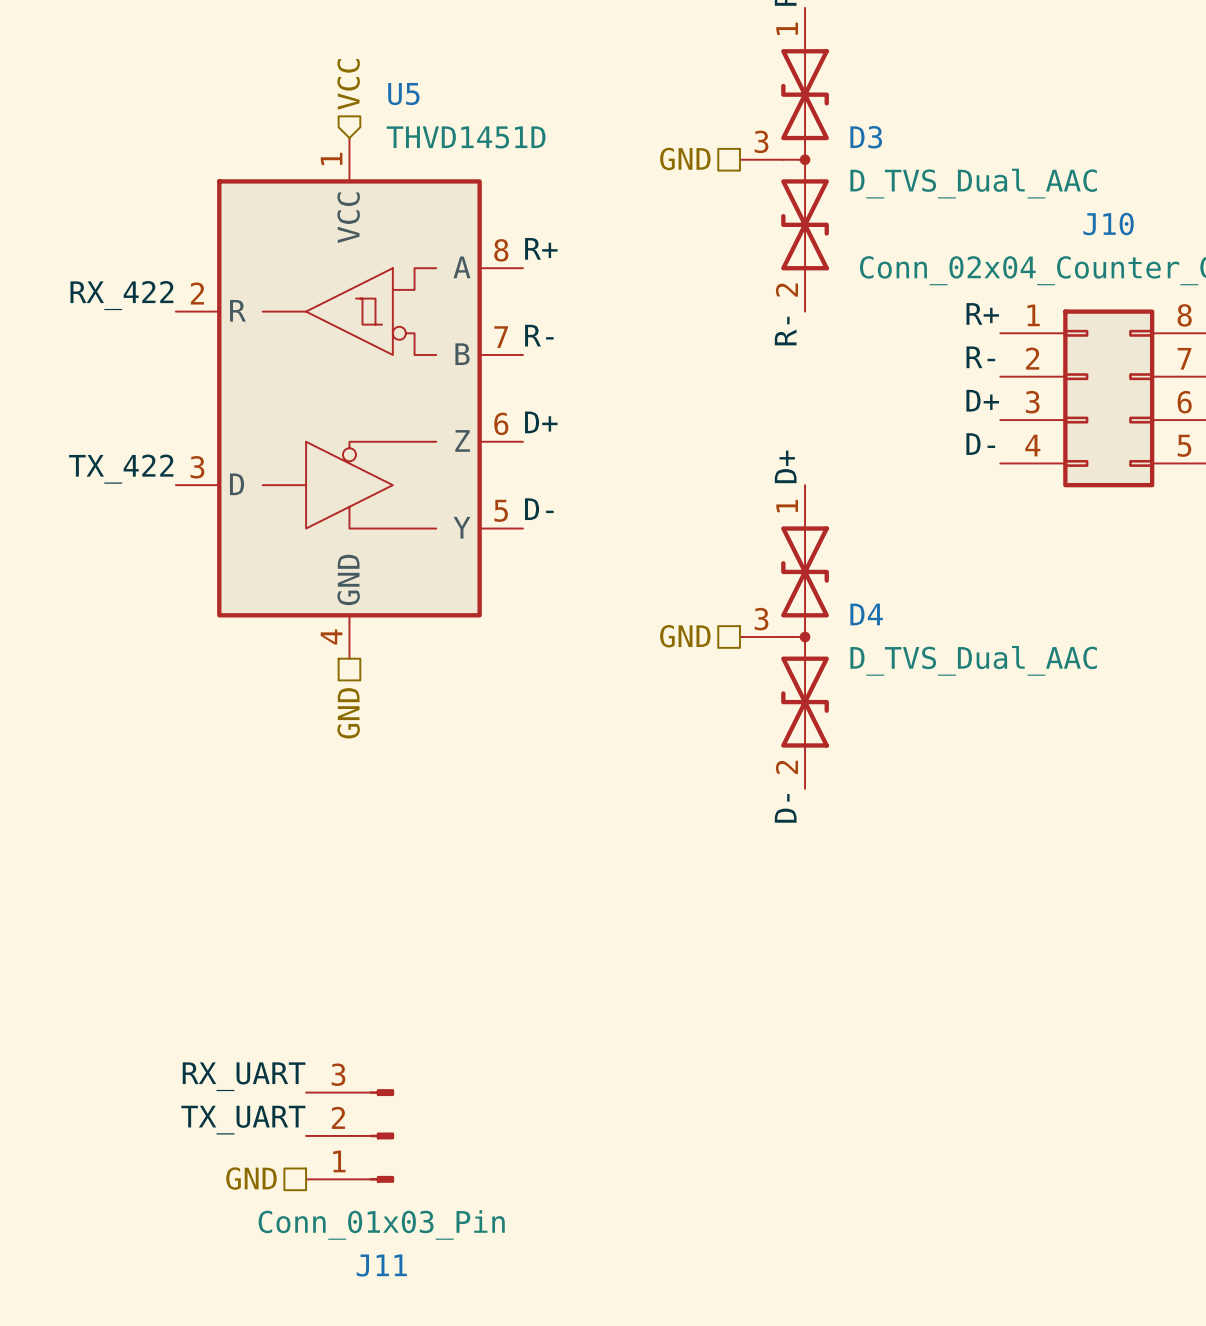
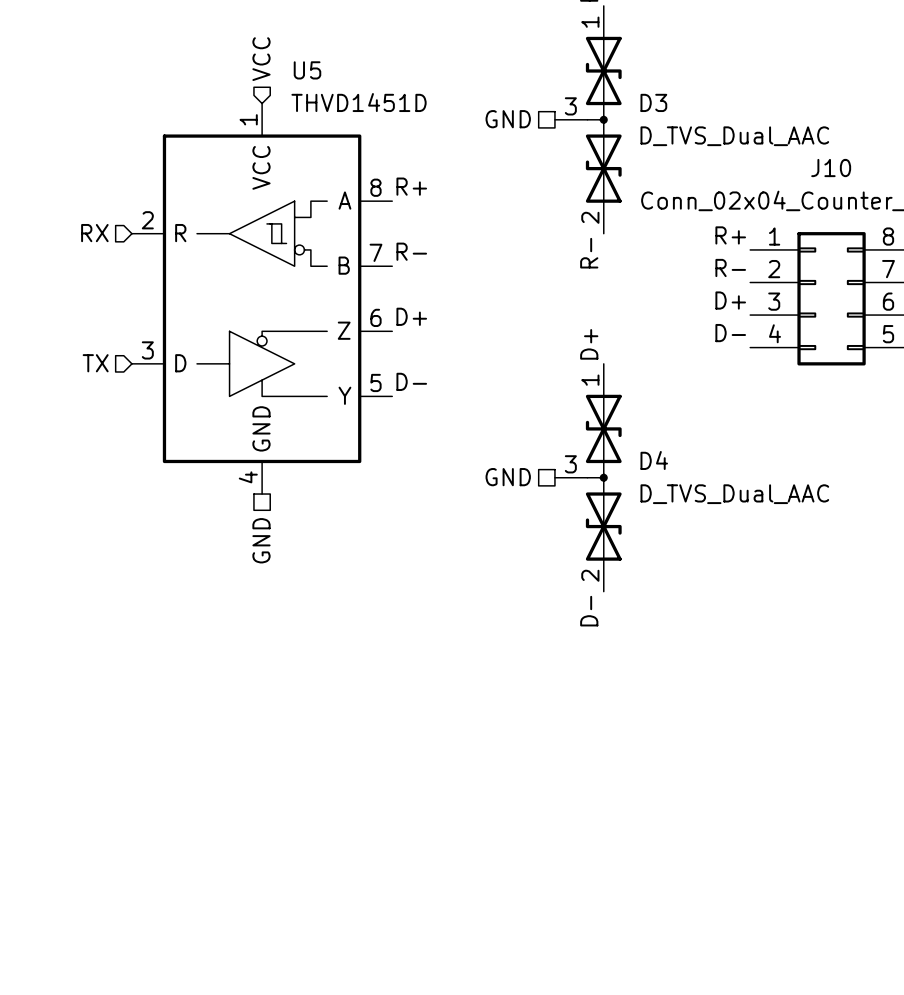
label: RX_422 (121, 295) -> none
hierarchical label: none -> RX (94, 233)
label: TX_422 (121, 469) -> none
hierarchical label: none -> TX (95, 363)
label: RX_UART (244, 1076) -> none
label: TX_UART (243, 1120) -> none
J11: Conn_01x03_Pin (350, 1135) -> none
hierarchical label: GND (251, 1178) -> none

